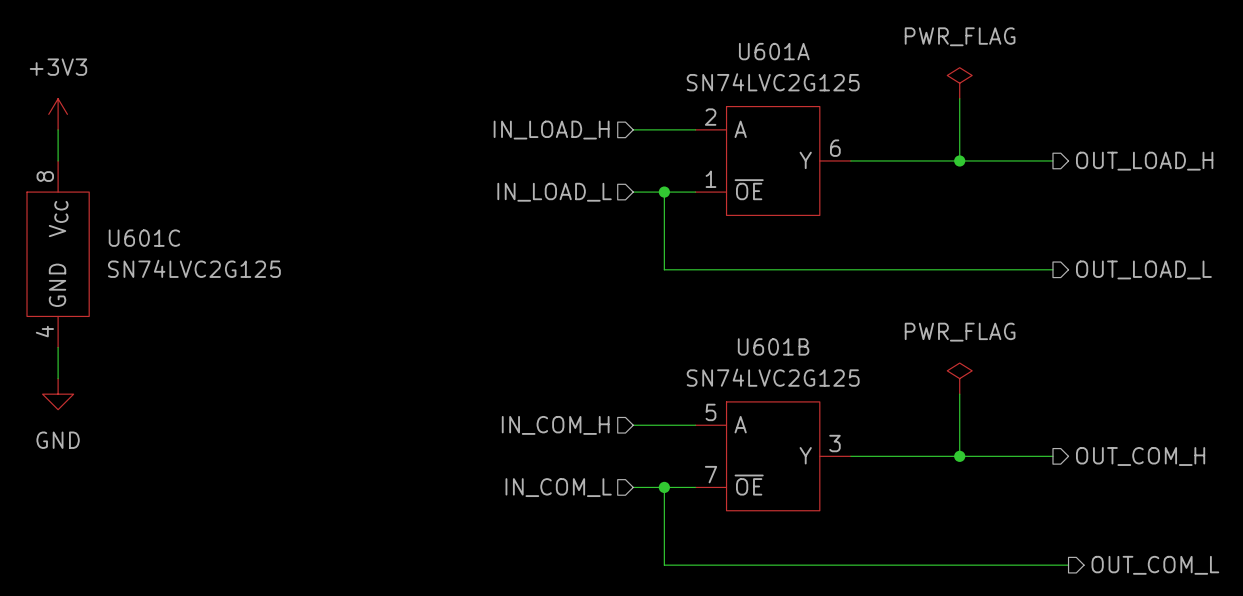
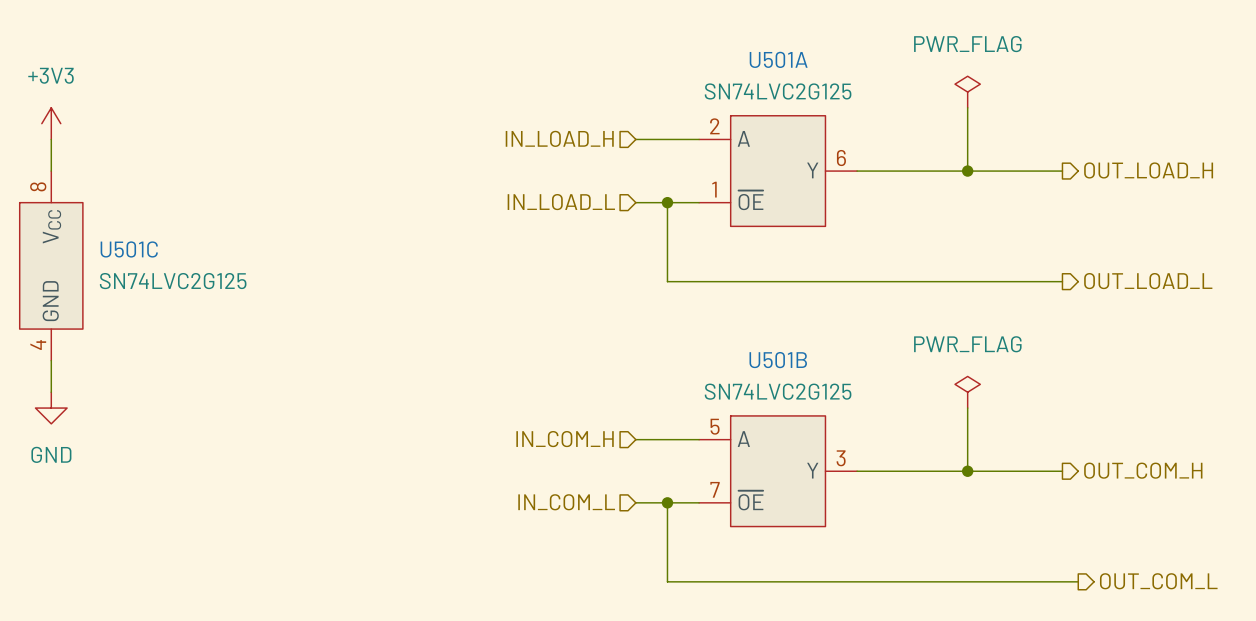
U601A name: U601A (774, 51) -> U501A (778, 59)
U601C name: U601C (144, 238) -> U501C (129, 249)
U601B name: U601B (773, 346) -> U501B (778, 360)

